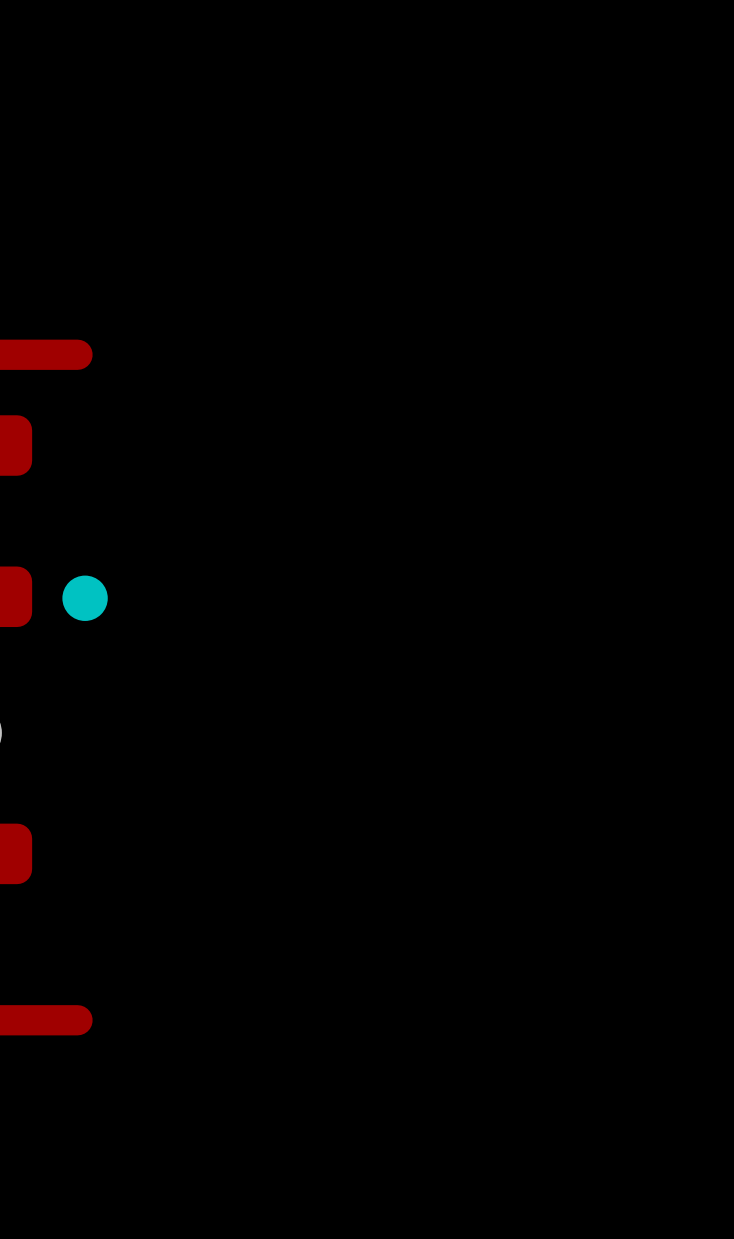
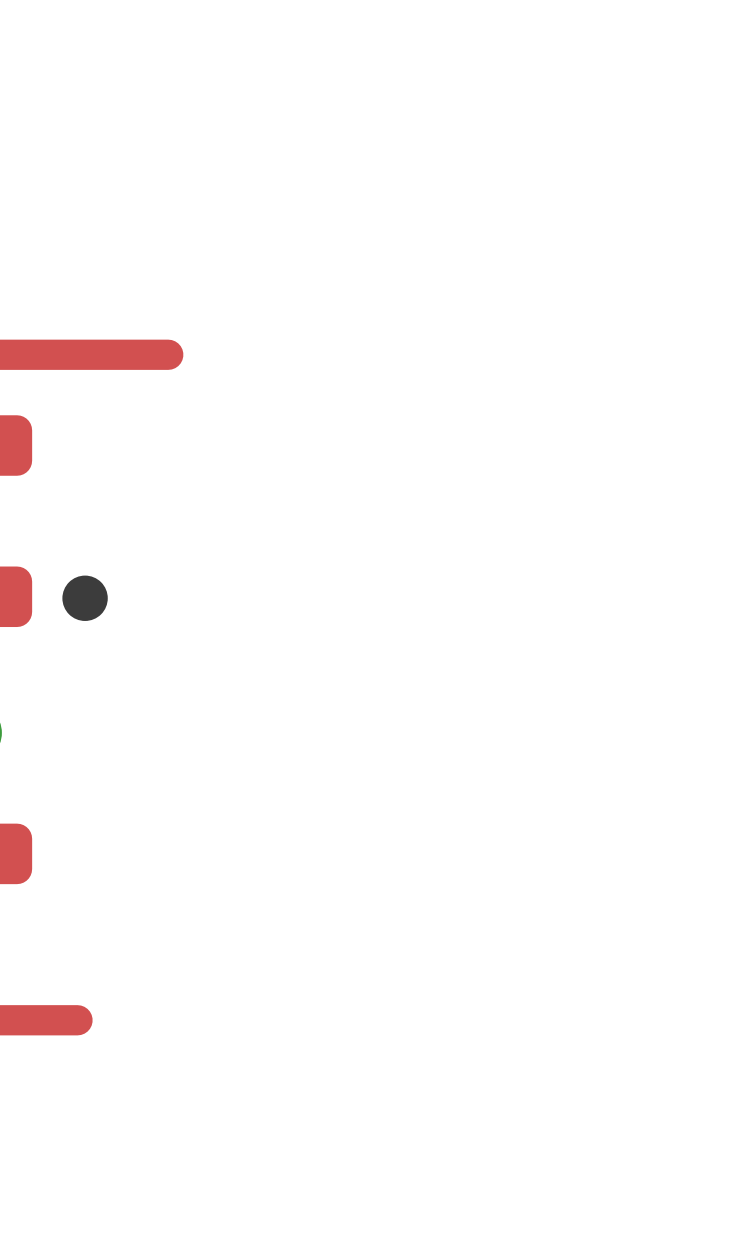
top track: none -> (77, 354) (168, 354)

